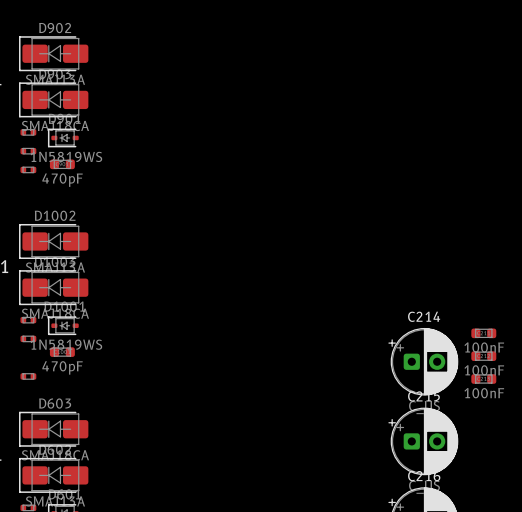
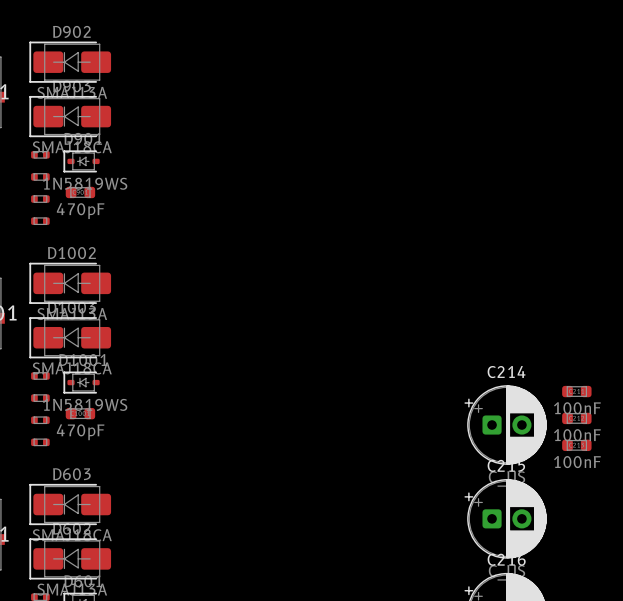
part: none -> (40, 221)
part: none -> (40, 420)

